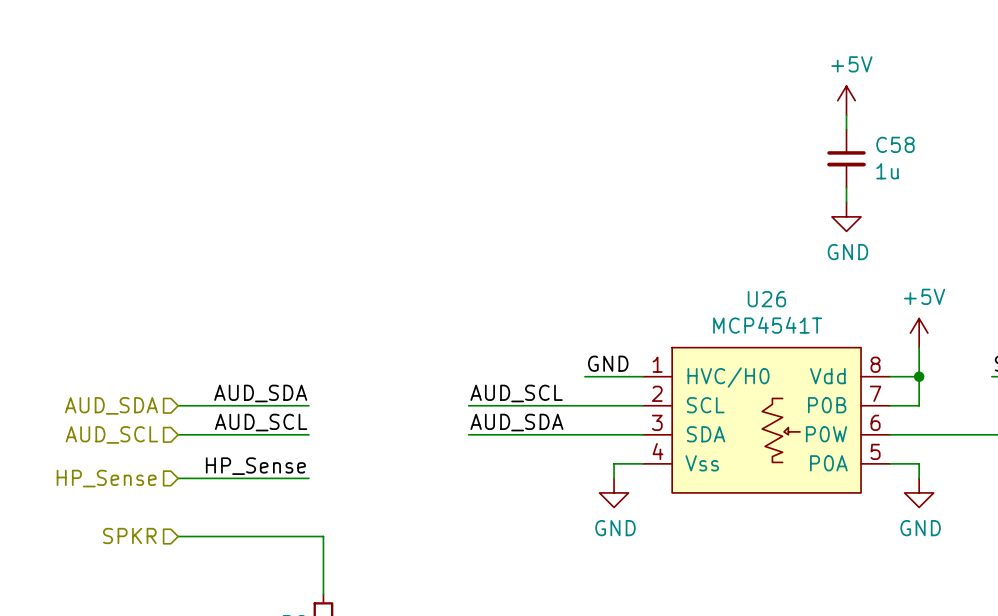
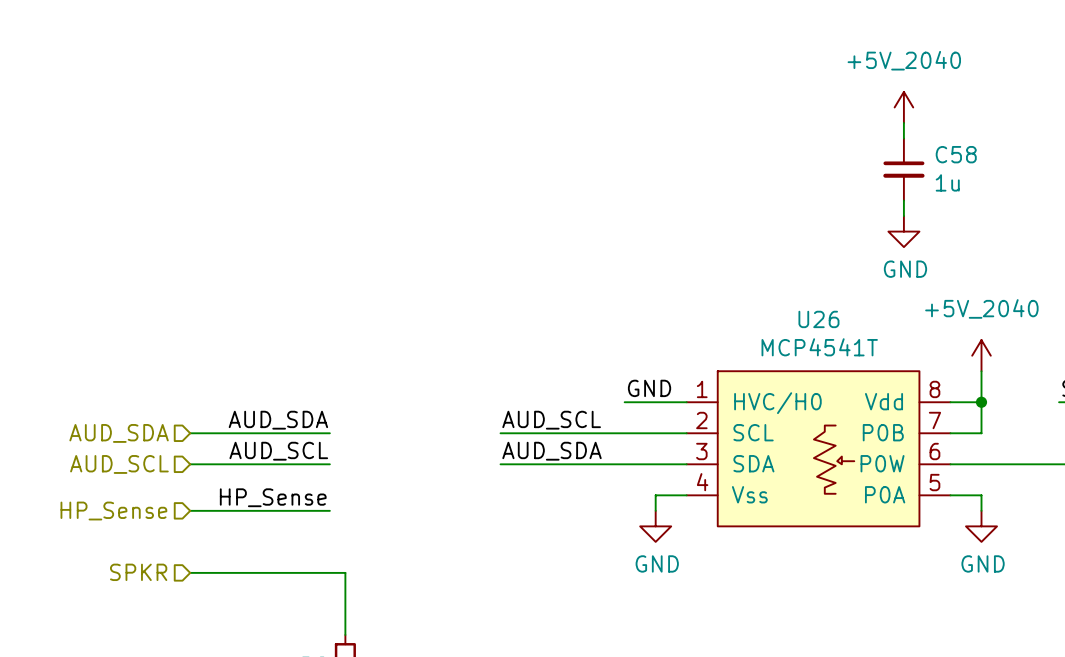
power symbol: +5V (846, 100) -> +5V_2040 (903, 107)
power symbol: +5V (919, 333) -> +5V_2040 (981, 355)

